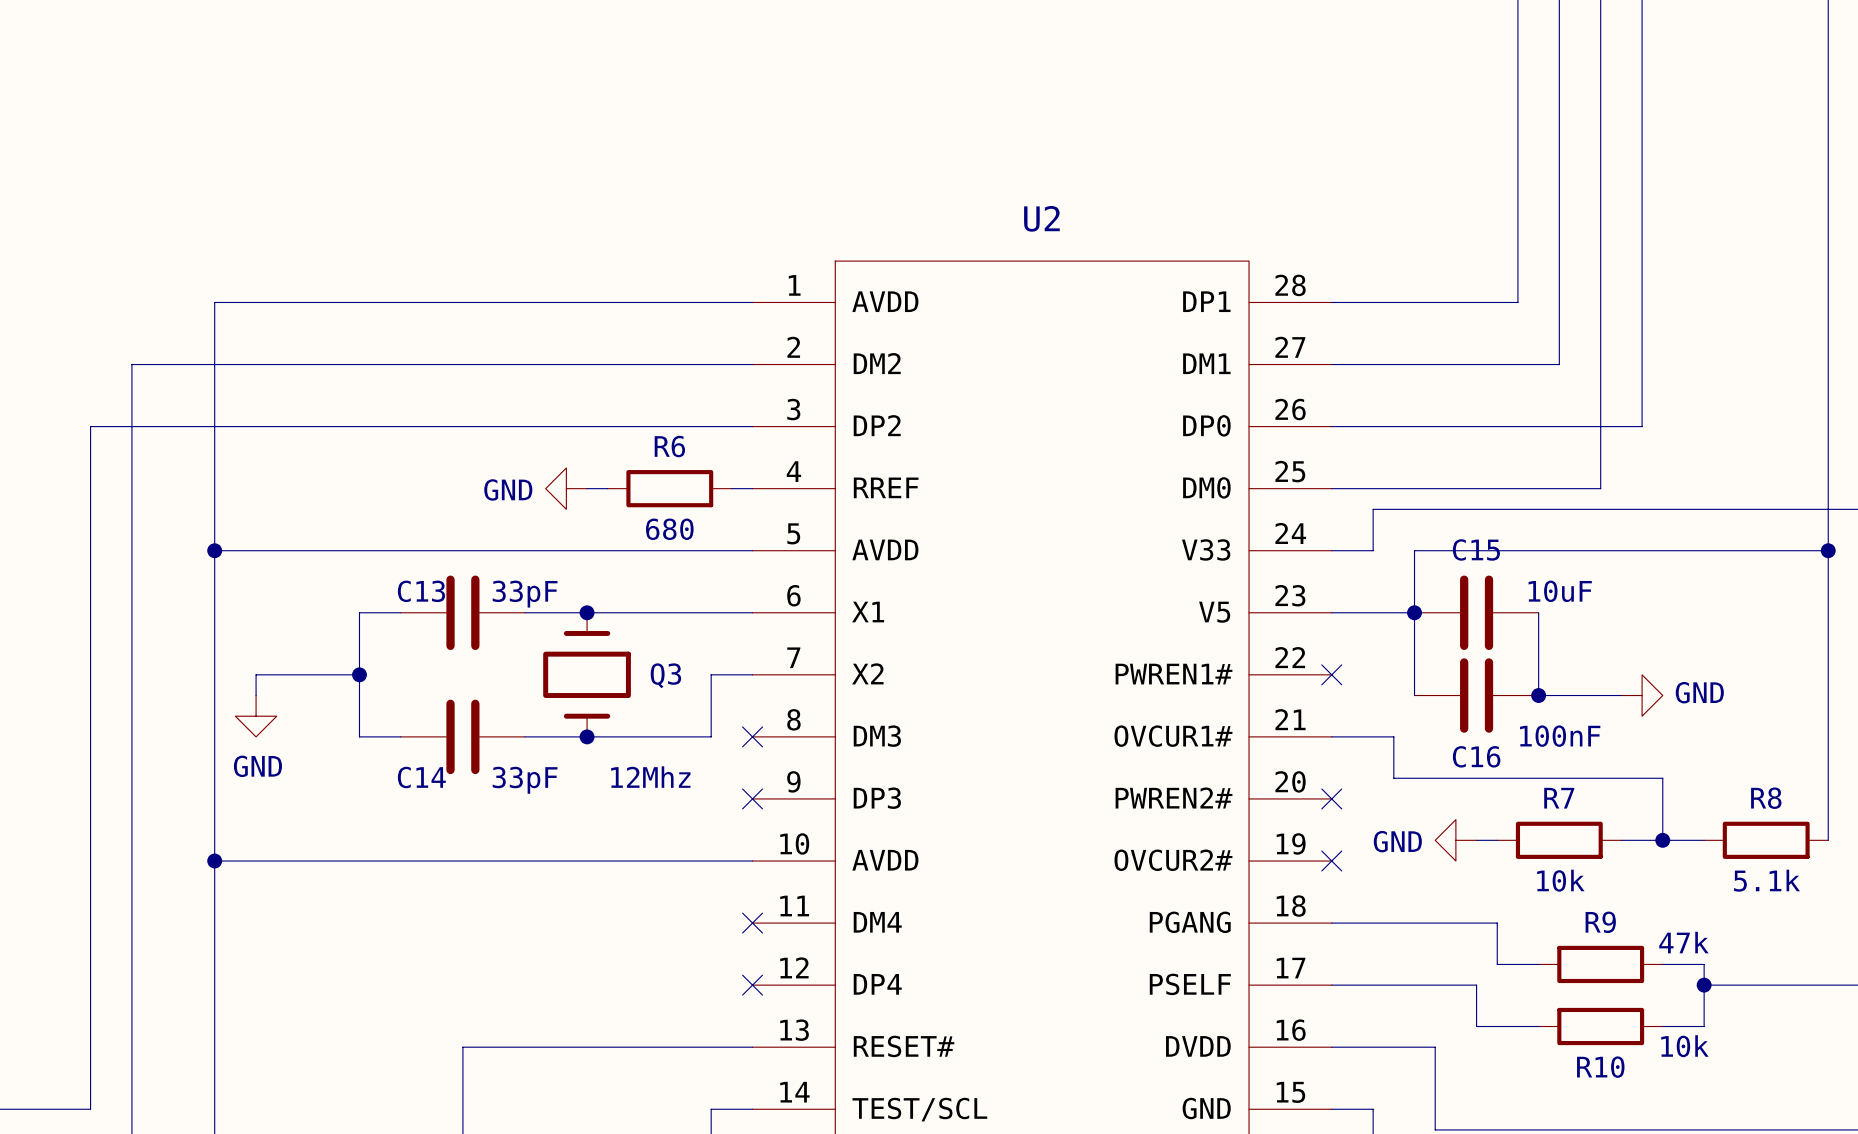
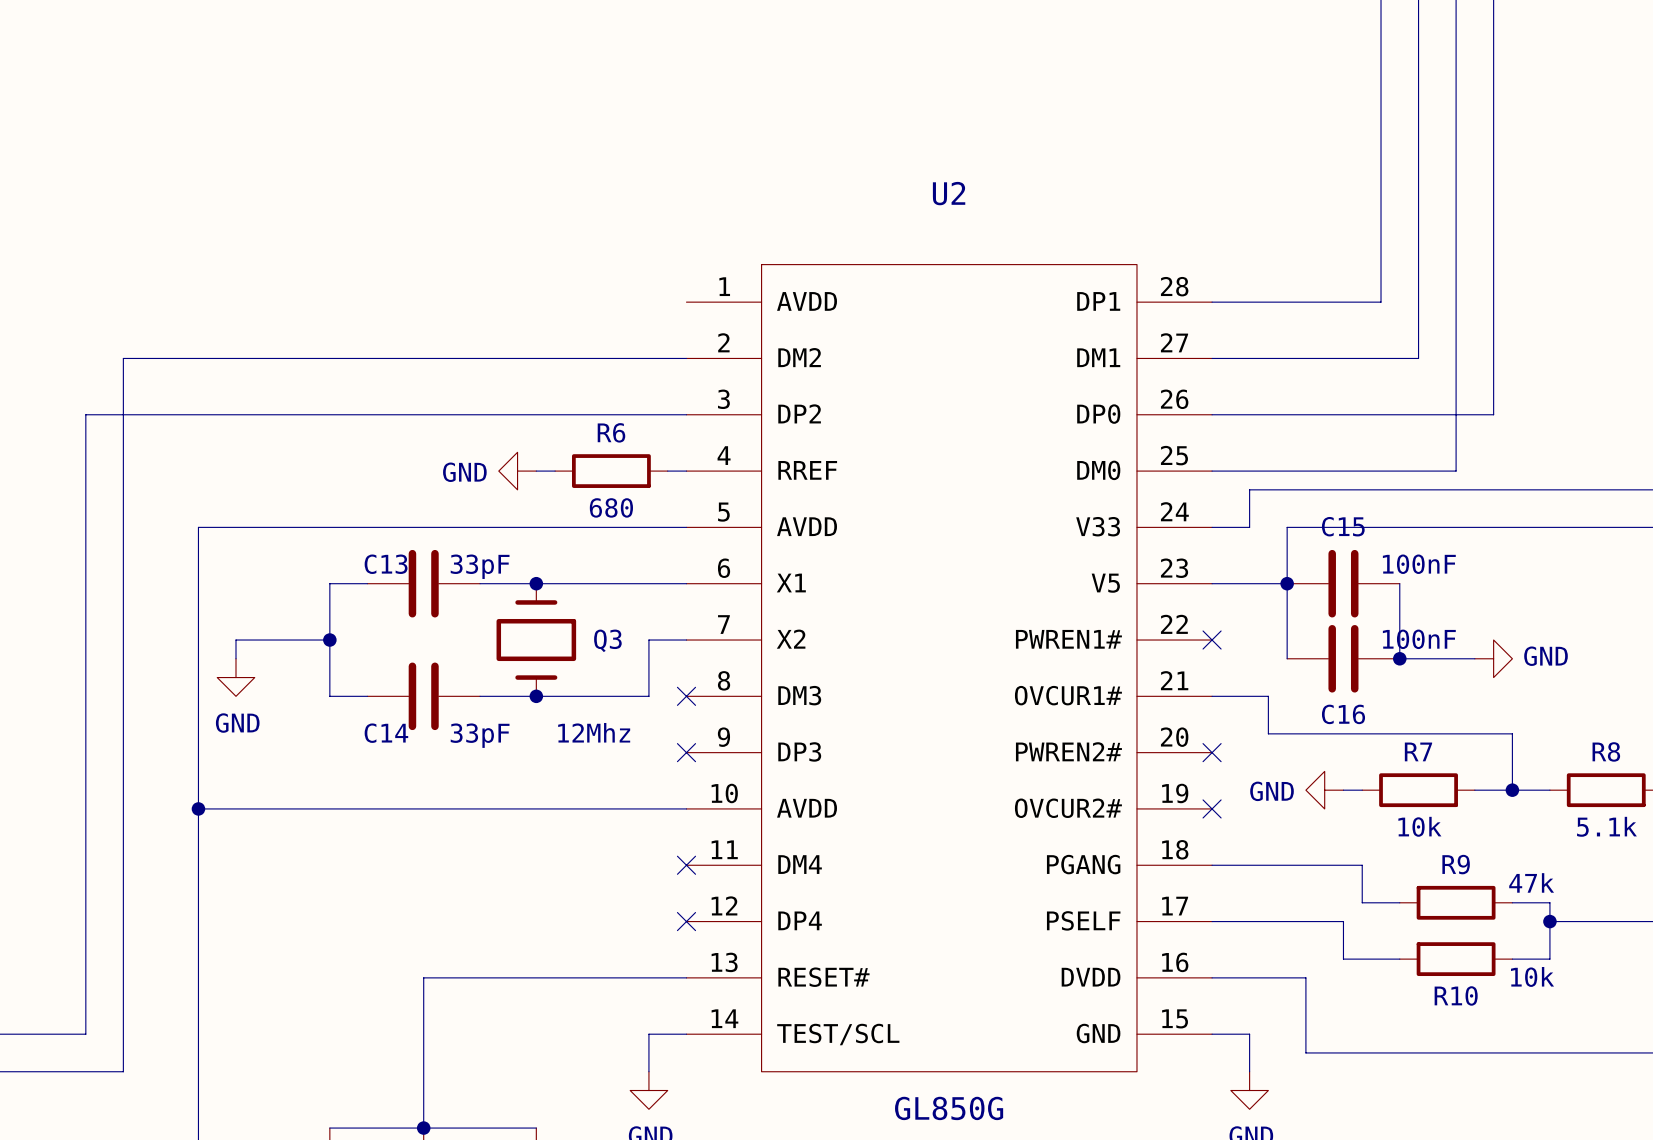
U2 name position: U2 (1041, 218) -> U2 (949, 193)
wire: (752, 302) (214, 302) (214, 550) -> none
junction: (214, 550) -> none
C15 value: 10uF (1560, 591) -> 100nF (1419, 564)
C16 value position: 100nF (1560, 736) -> 100nF (1419, 639)

